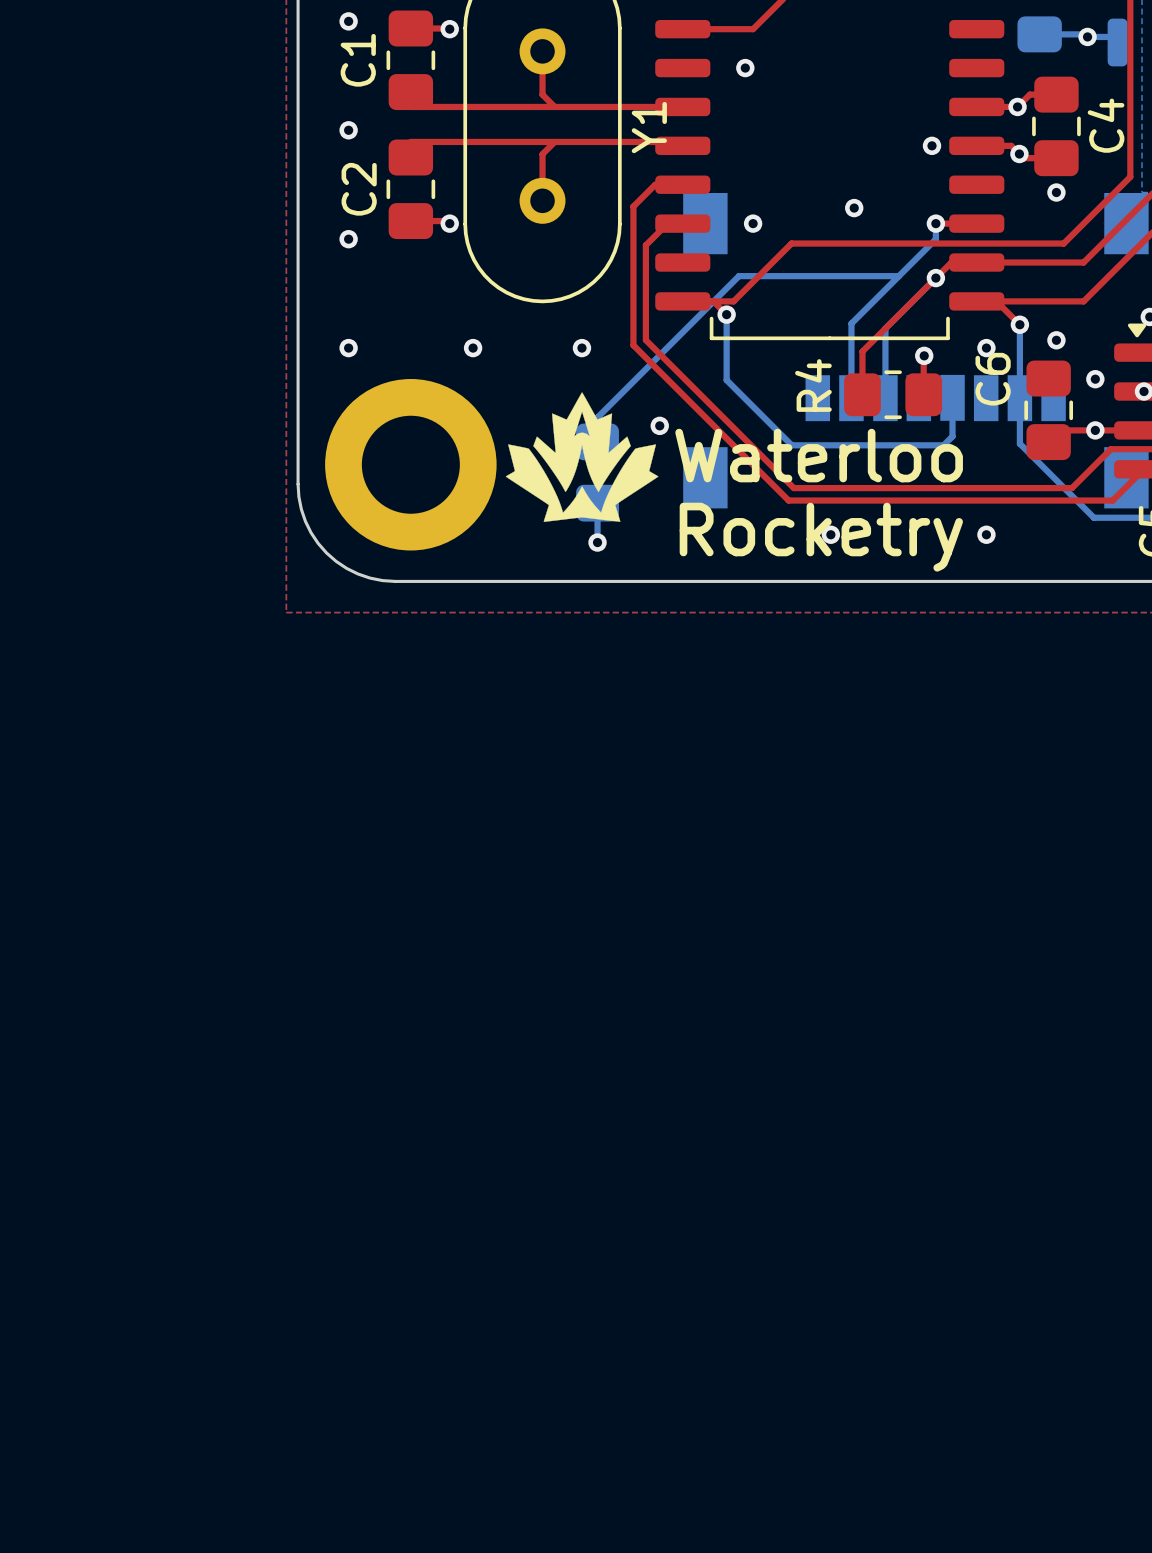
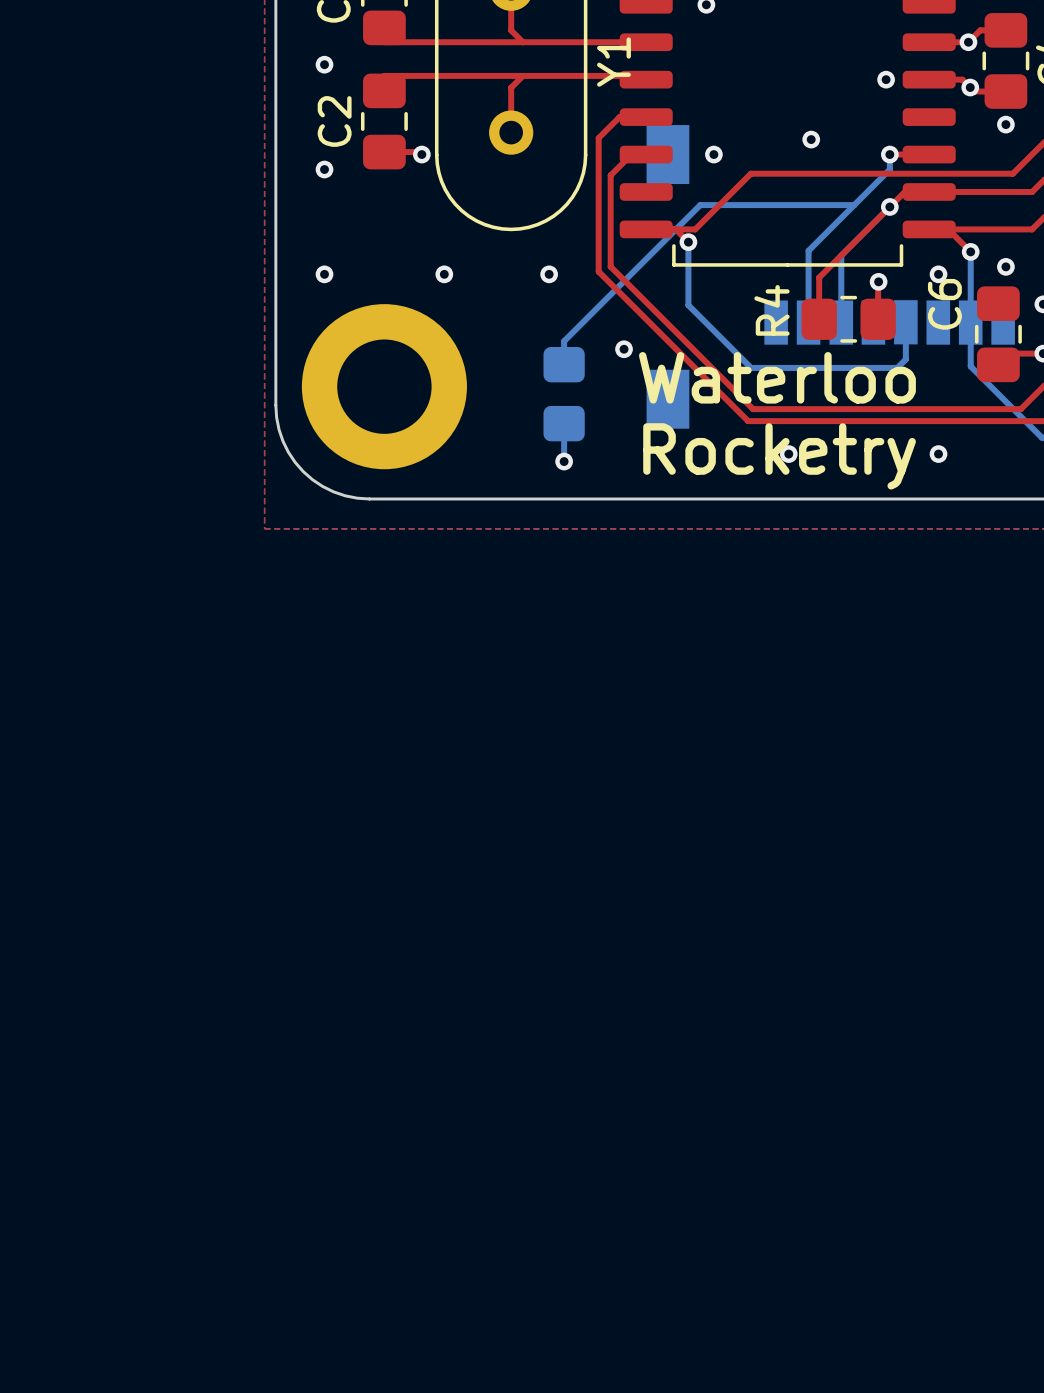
drawing: [505, 392, 659, 522] -> none

